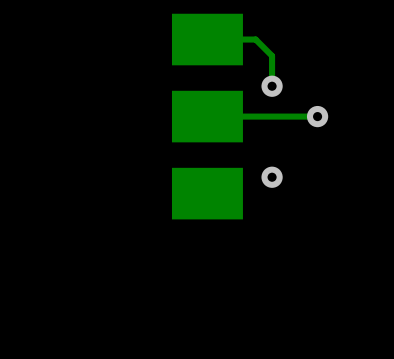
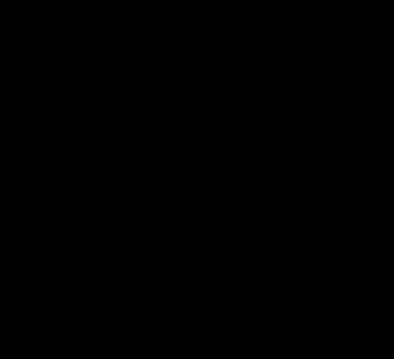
track: (207, 39) (255, 39) (272, 55) (272, 86) -> none
via: (272, 86) -> none
part: (207, 116) -> none
track: (317, 116) (207, 116) -> none
via: (317, 116) -> none
via: (272, 177) -> none

